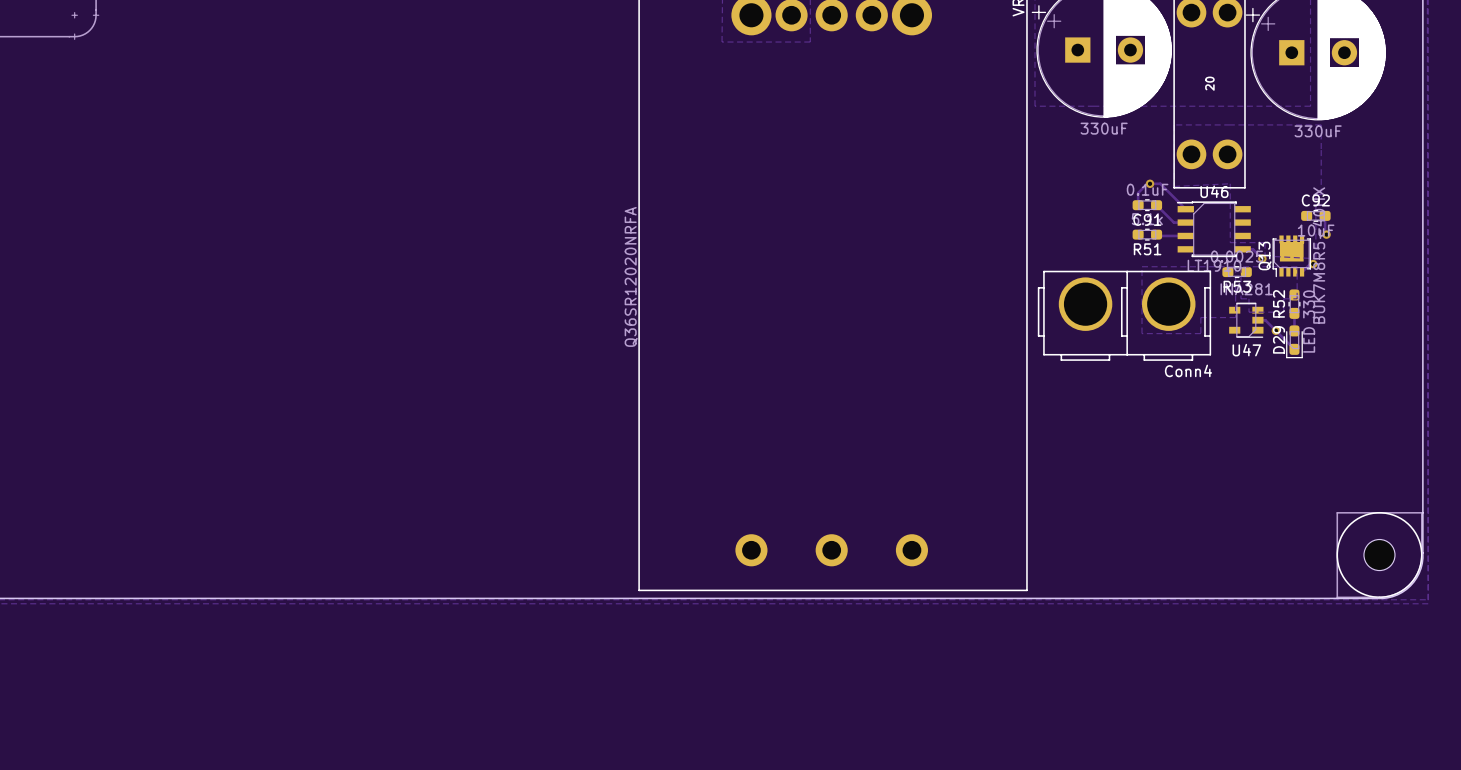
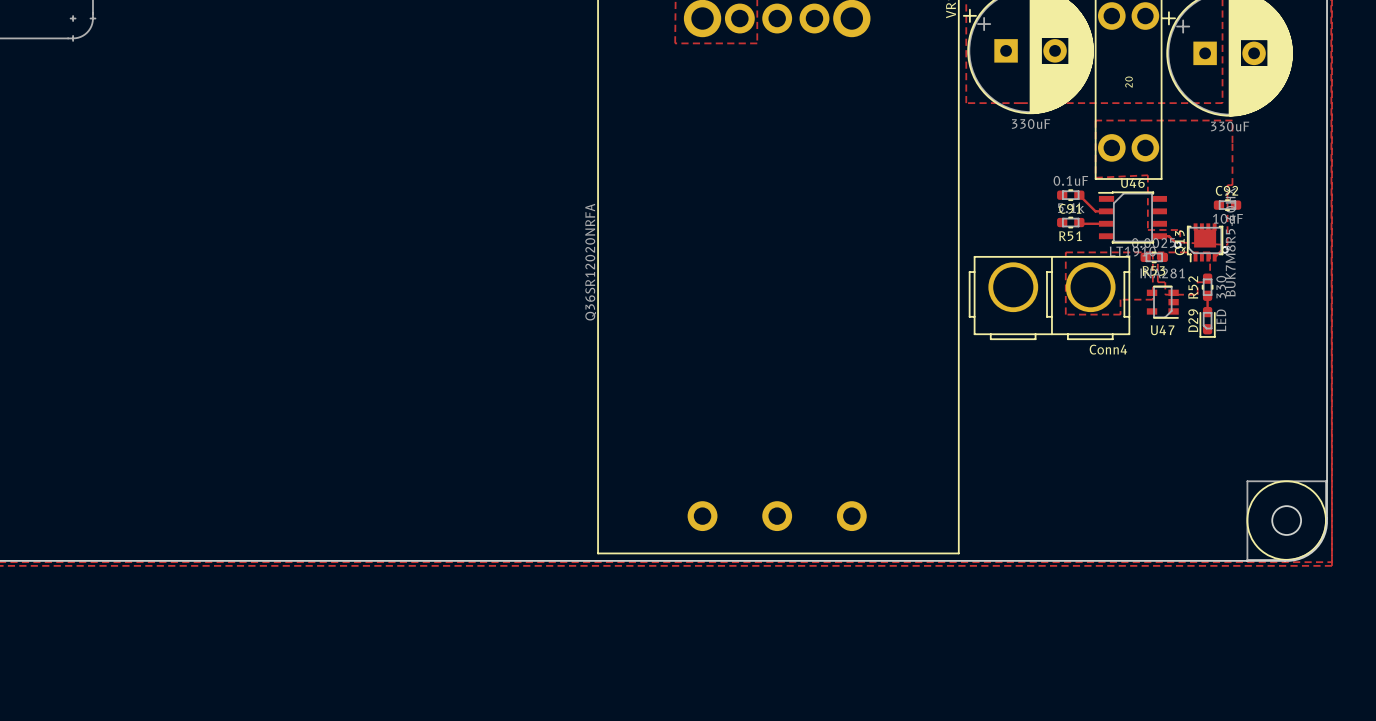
via: (1150, 183) -> none
track: (1138, 205) (1138, 193) (1147, 183) (1160, 183) (1185, 209) -> none
track: (1325, 215) (1326, 234) -> none
via: (1326, 234) -> none
track: (1257, 320) (1265, 320) (1294, 349) -> none
via: (1275, 330) -> none

